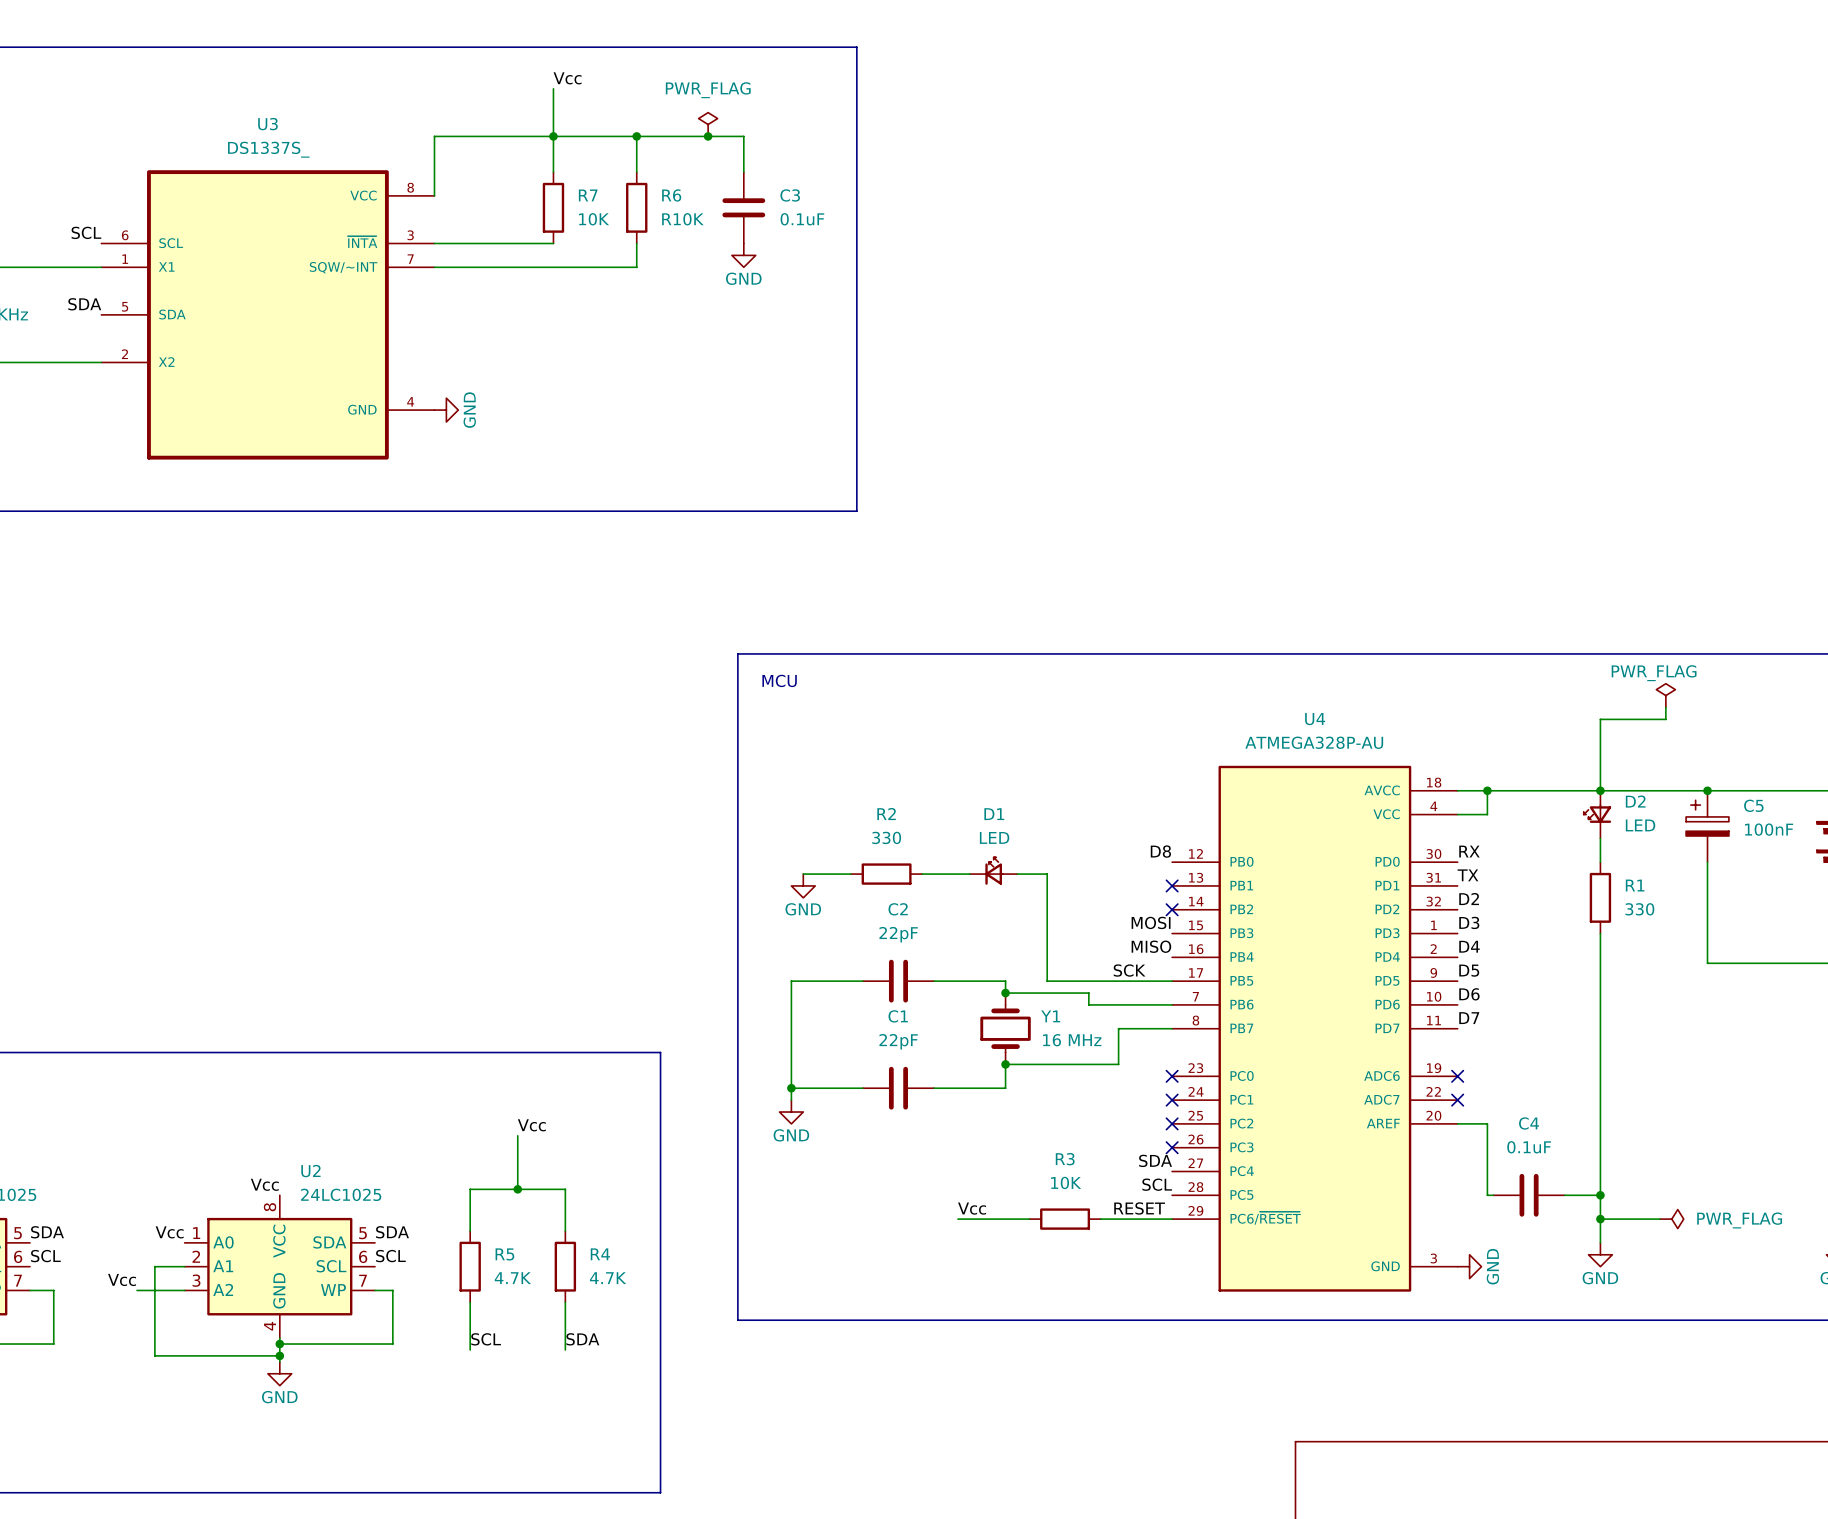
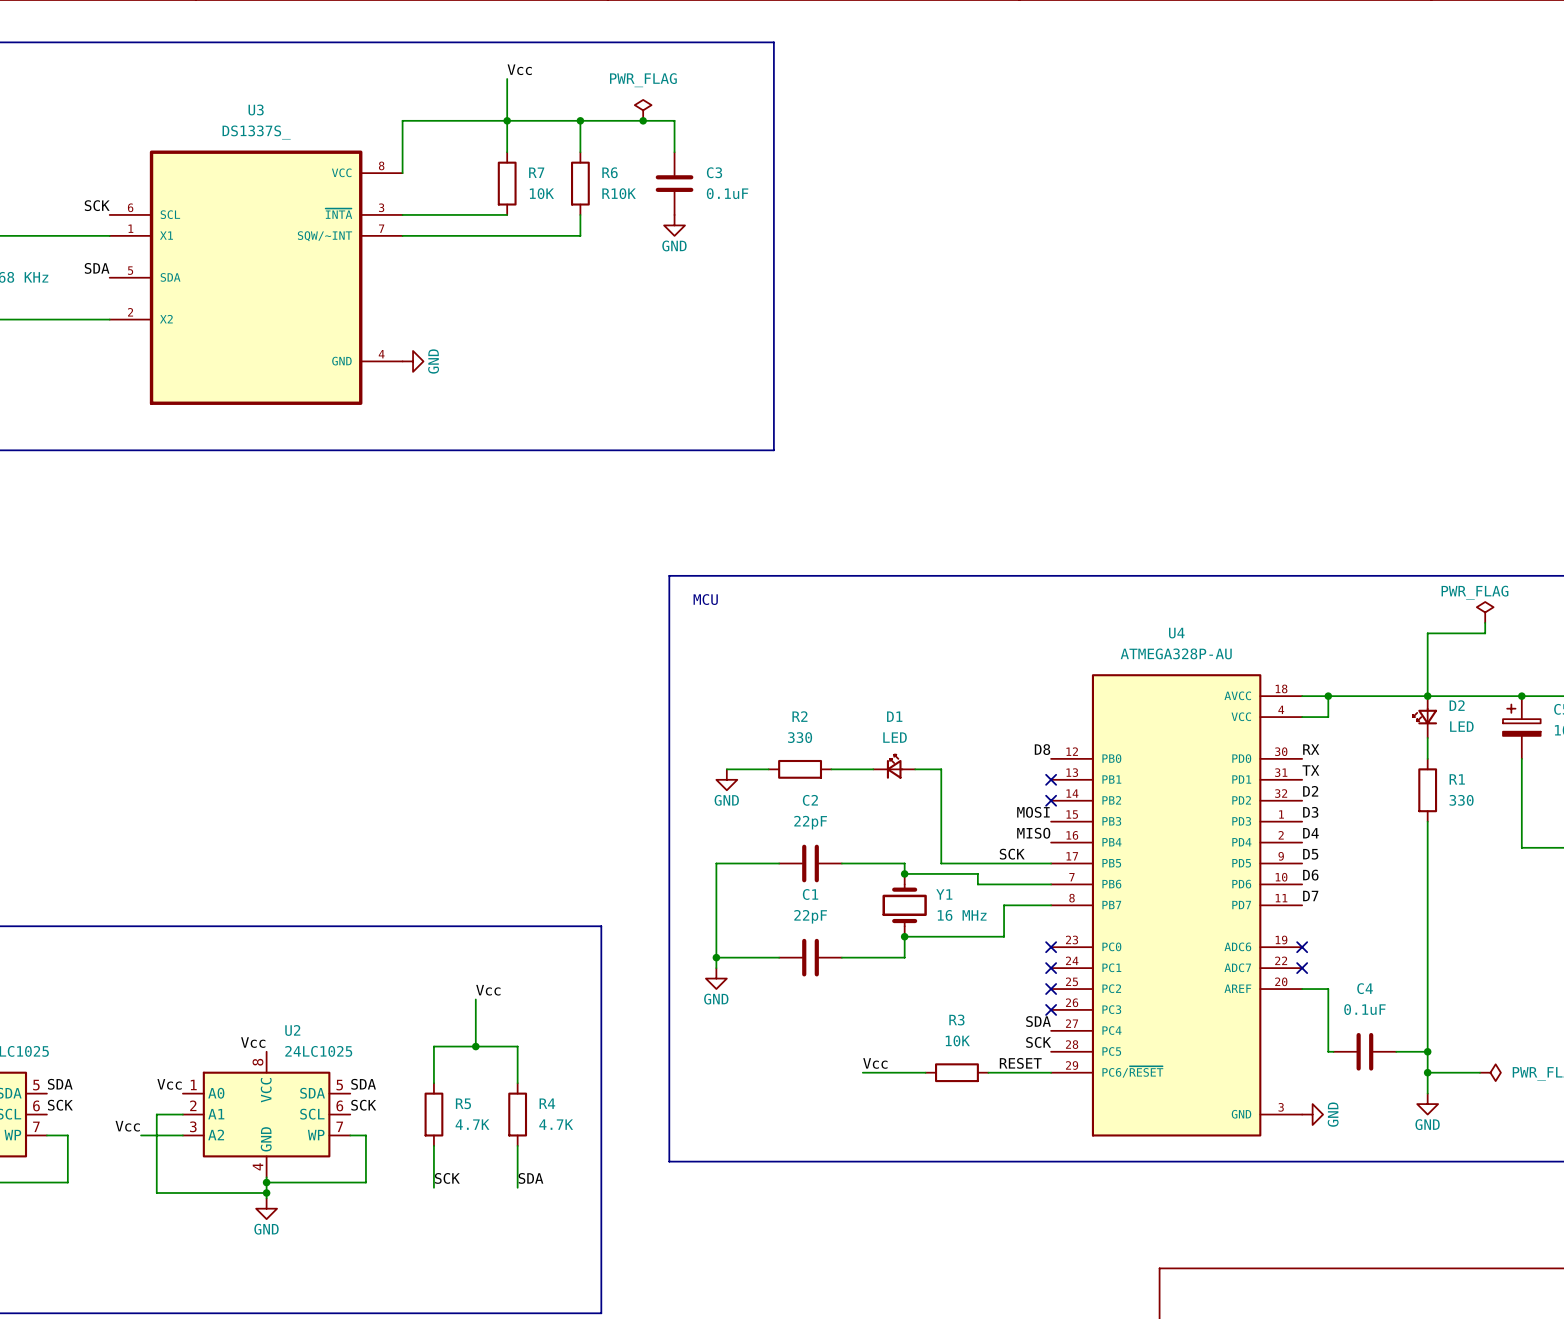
label: SCL (86, 232) -> SCK (97, 205)
label: SCL (1157, 1184) -> SCK (1038, 1042)
label: SCL (45, 1256) -> SCK (60, 1105)
label: SCL (390, 1256) -> SCK (363, 1105)
label: SCL (486, 1339) -> SCK (447, 1178)

